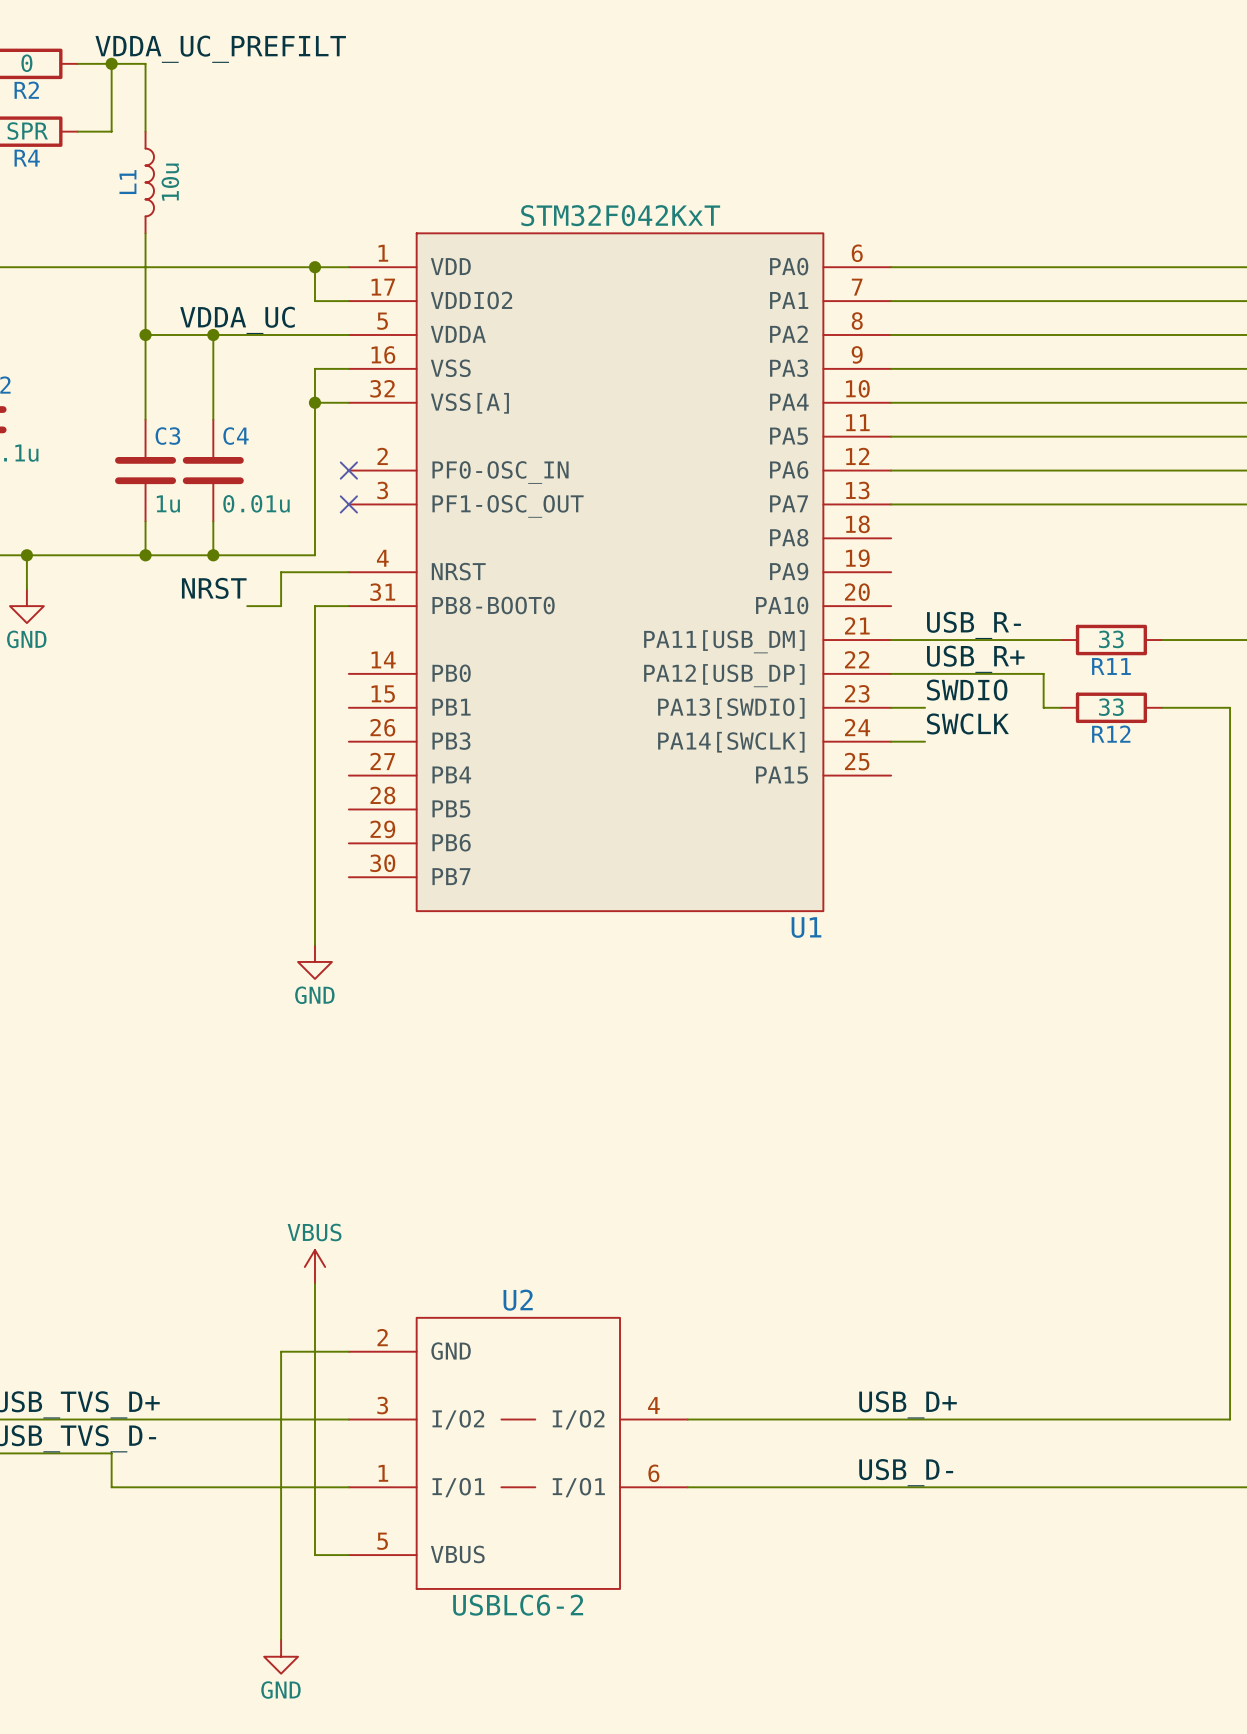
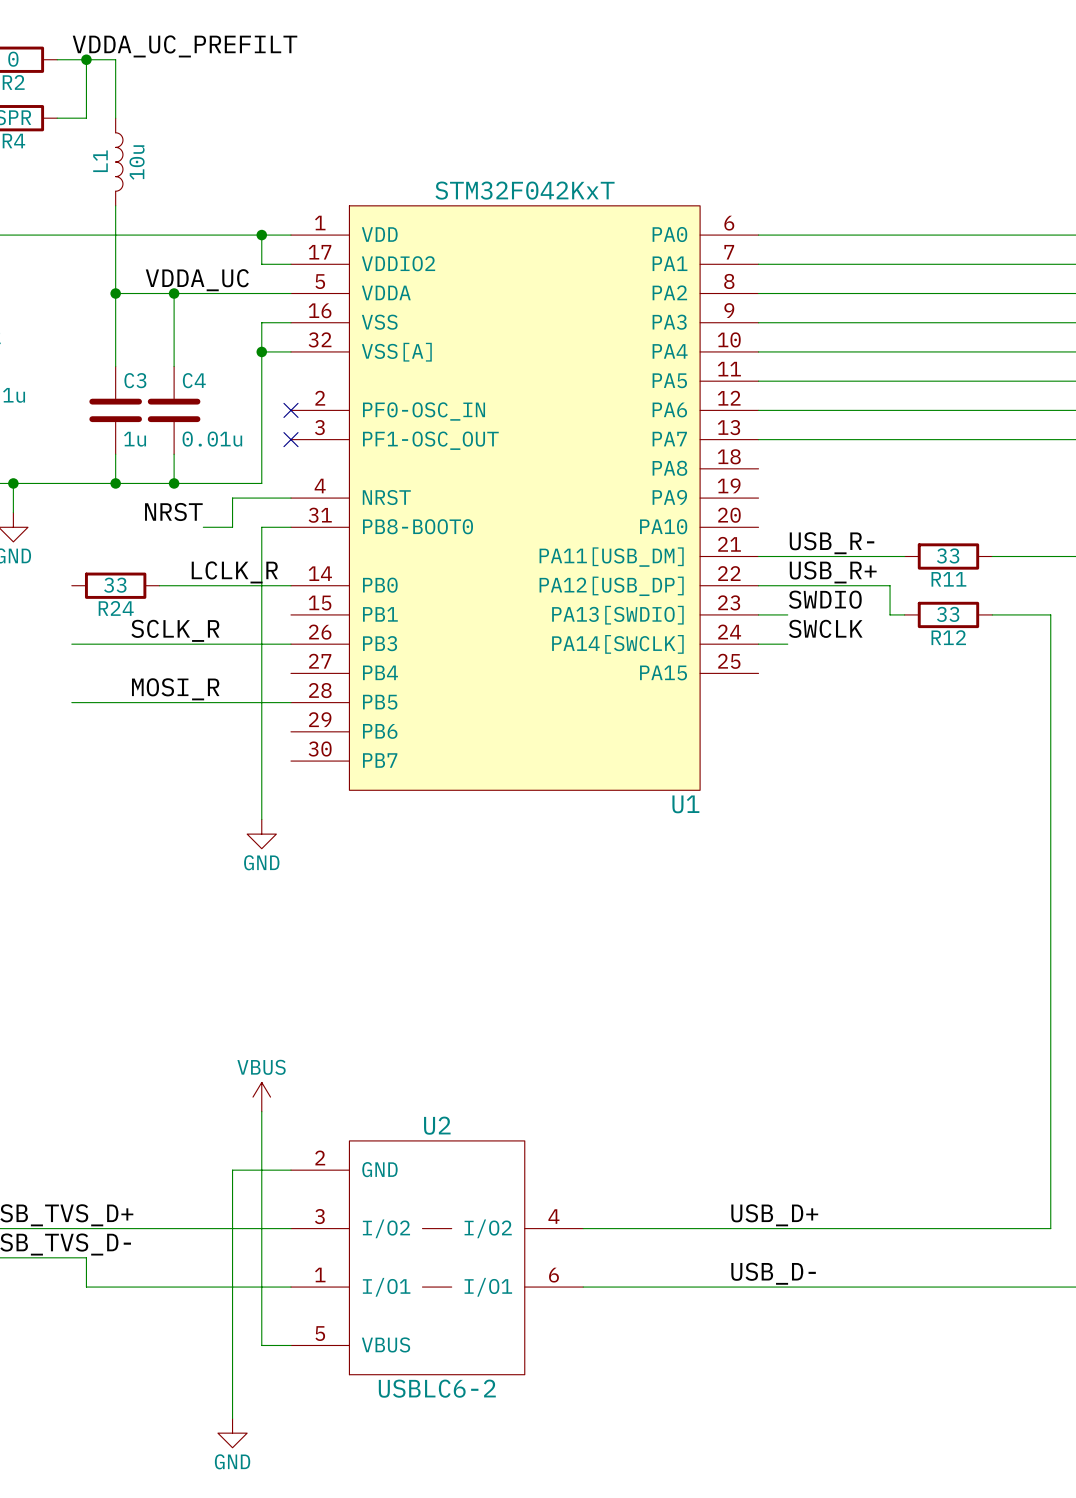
label: none -> LCLK_R (234, 572)
R24: none -> 33 (115, 585)
wire: none -> (159, 585) (290, 585)
label: none -> SCLK_R (175, 630)
wire: none -> (71, 644) (290, 644)
label: none -> MOSI_R (175, 689)
wire: none -> (71, 702) (290, 702)

